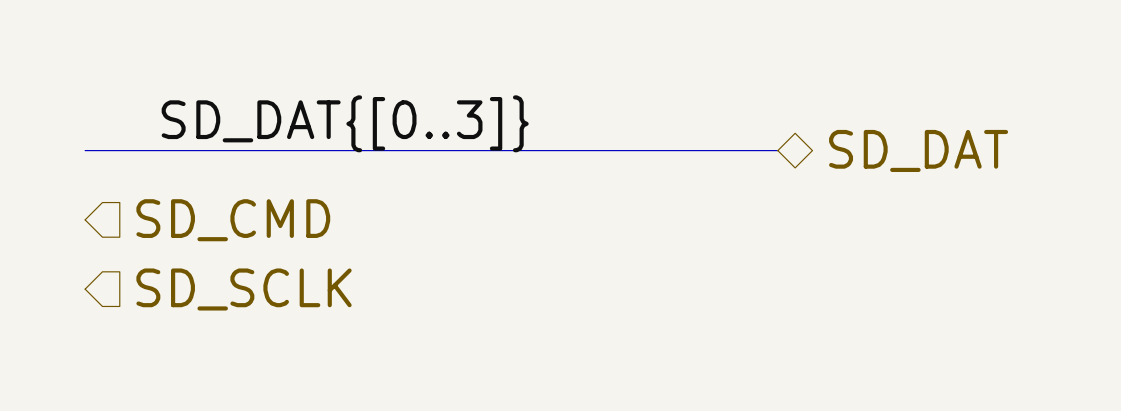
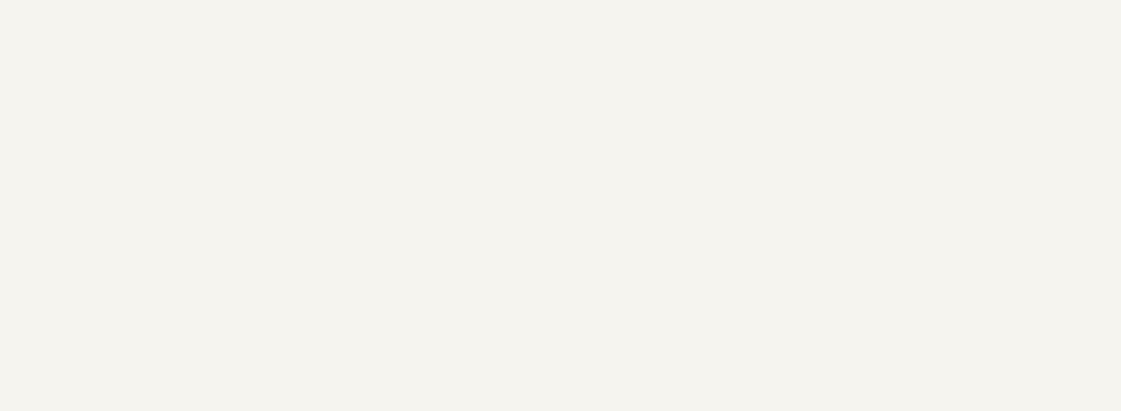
label: SD_DAT{[0..3]} (345, 123) -> none
bus: (85, 150) (777, 150) -> none
hierarchical label: SD_DAT (918, 150) -> none
hierarchical label: SD_CMD (233, 220) -> none
hierarchical label: SD_SCLK (244, 289) -> none

